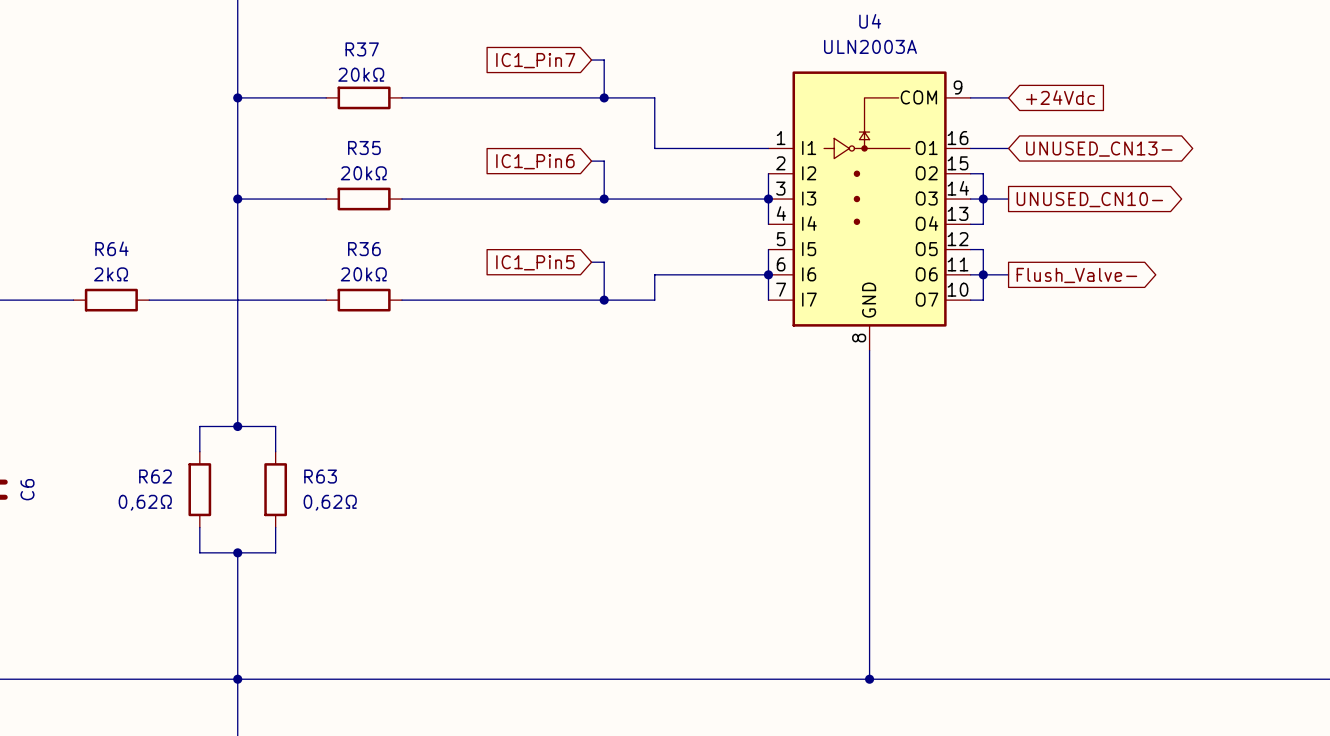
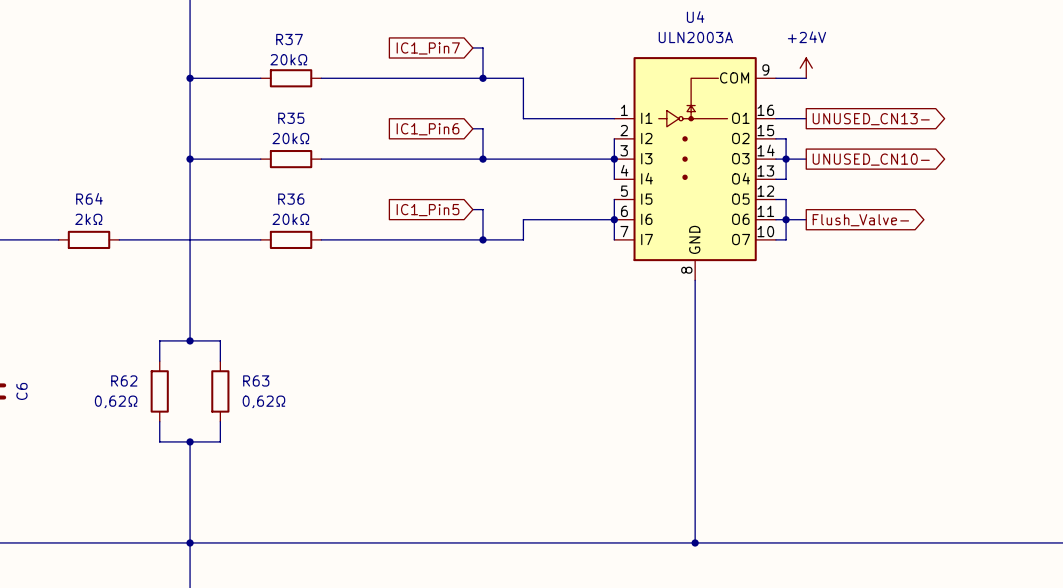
power symbol: none -> +24V (806, 68)
global label: +24Vdc (1060, 97) -> none
global label shape: bidirectional (1099, 149) -> output (871, 119)

